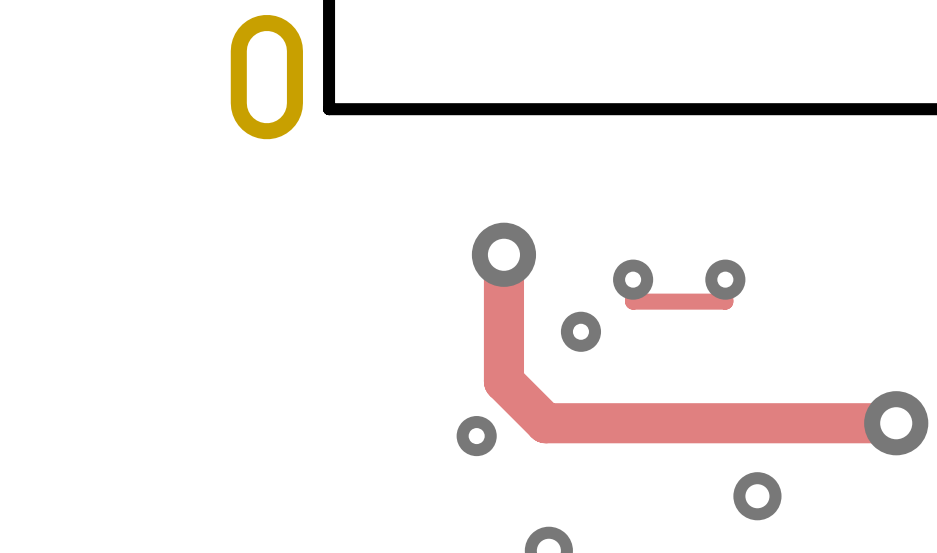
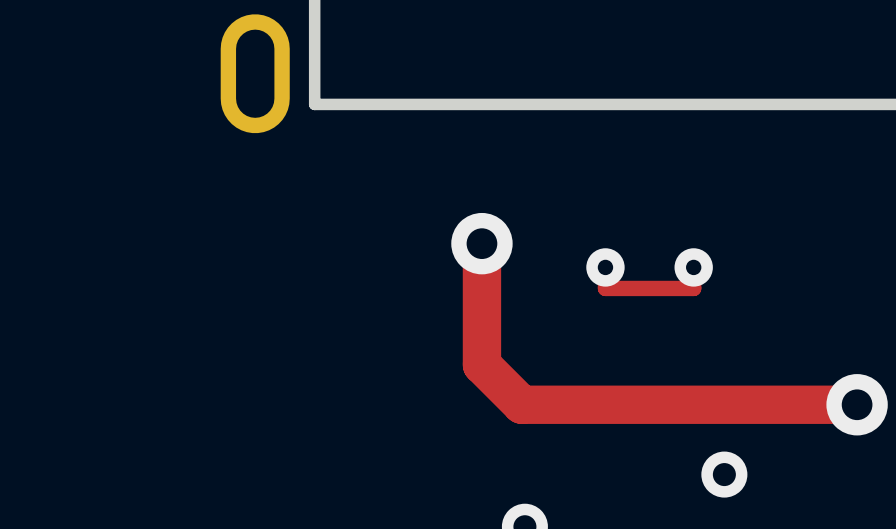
via: (580, 331) -> none
via: (476, 436) -> none

